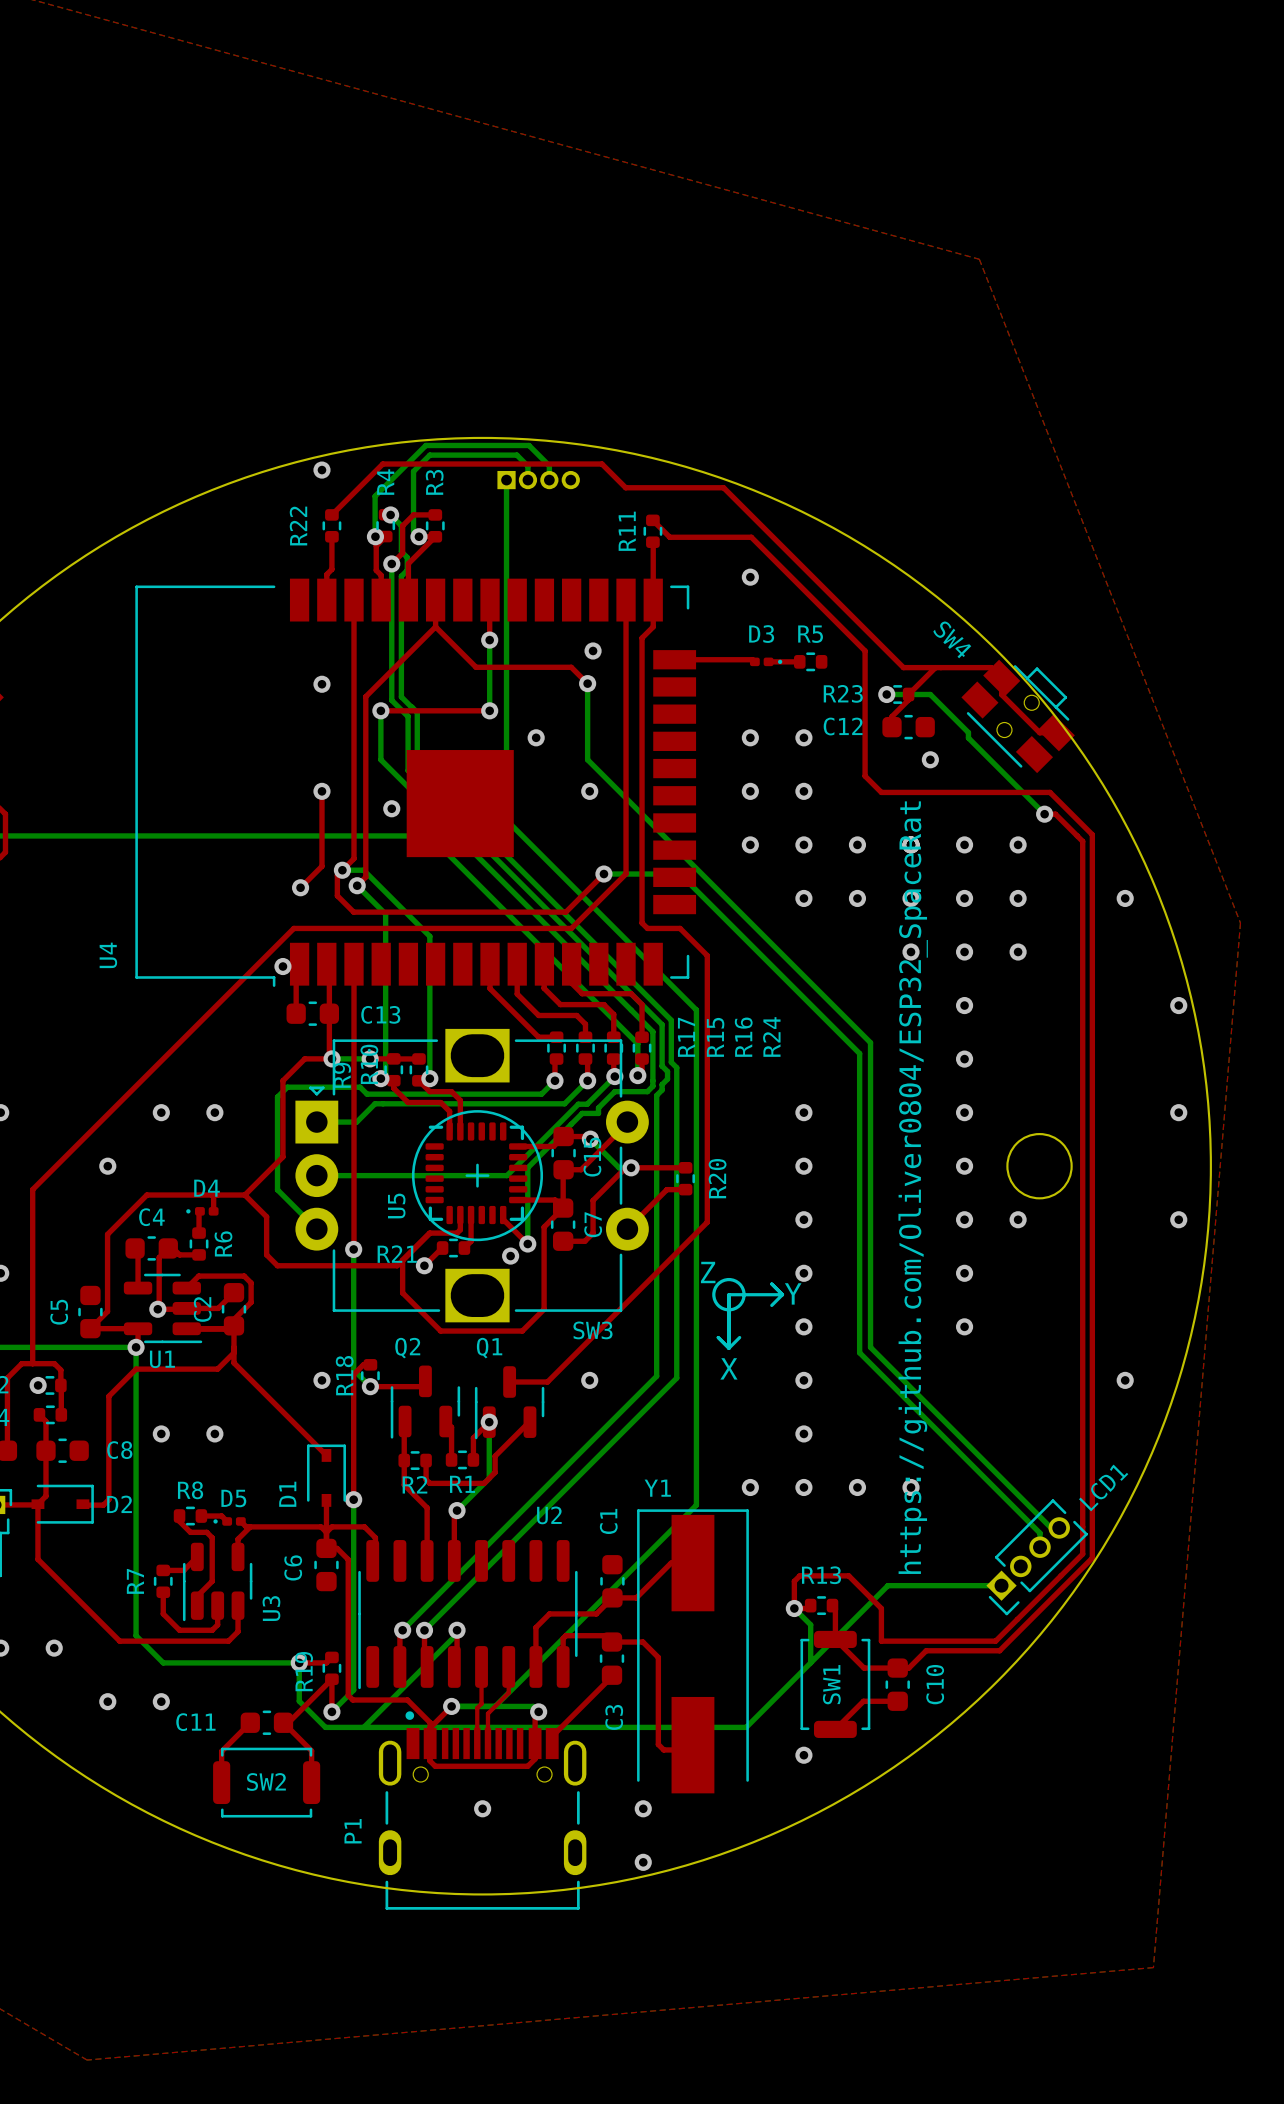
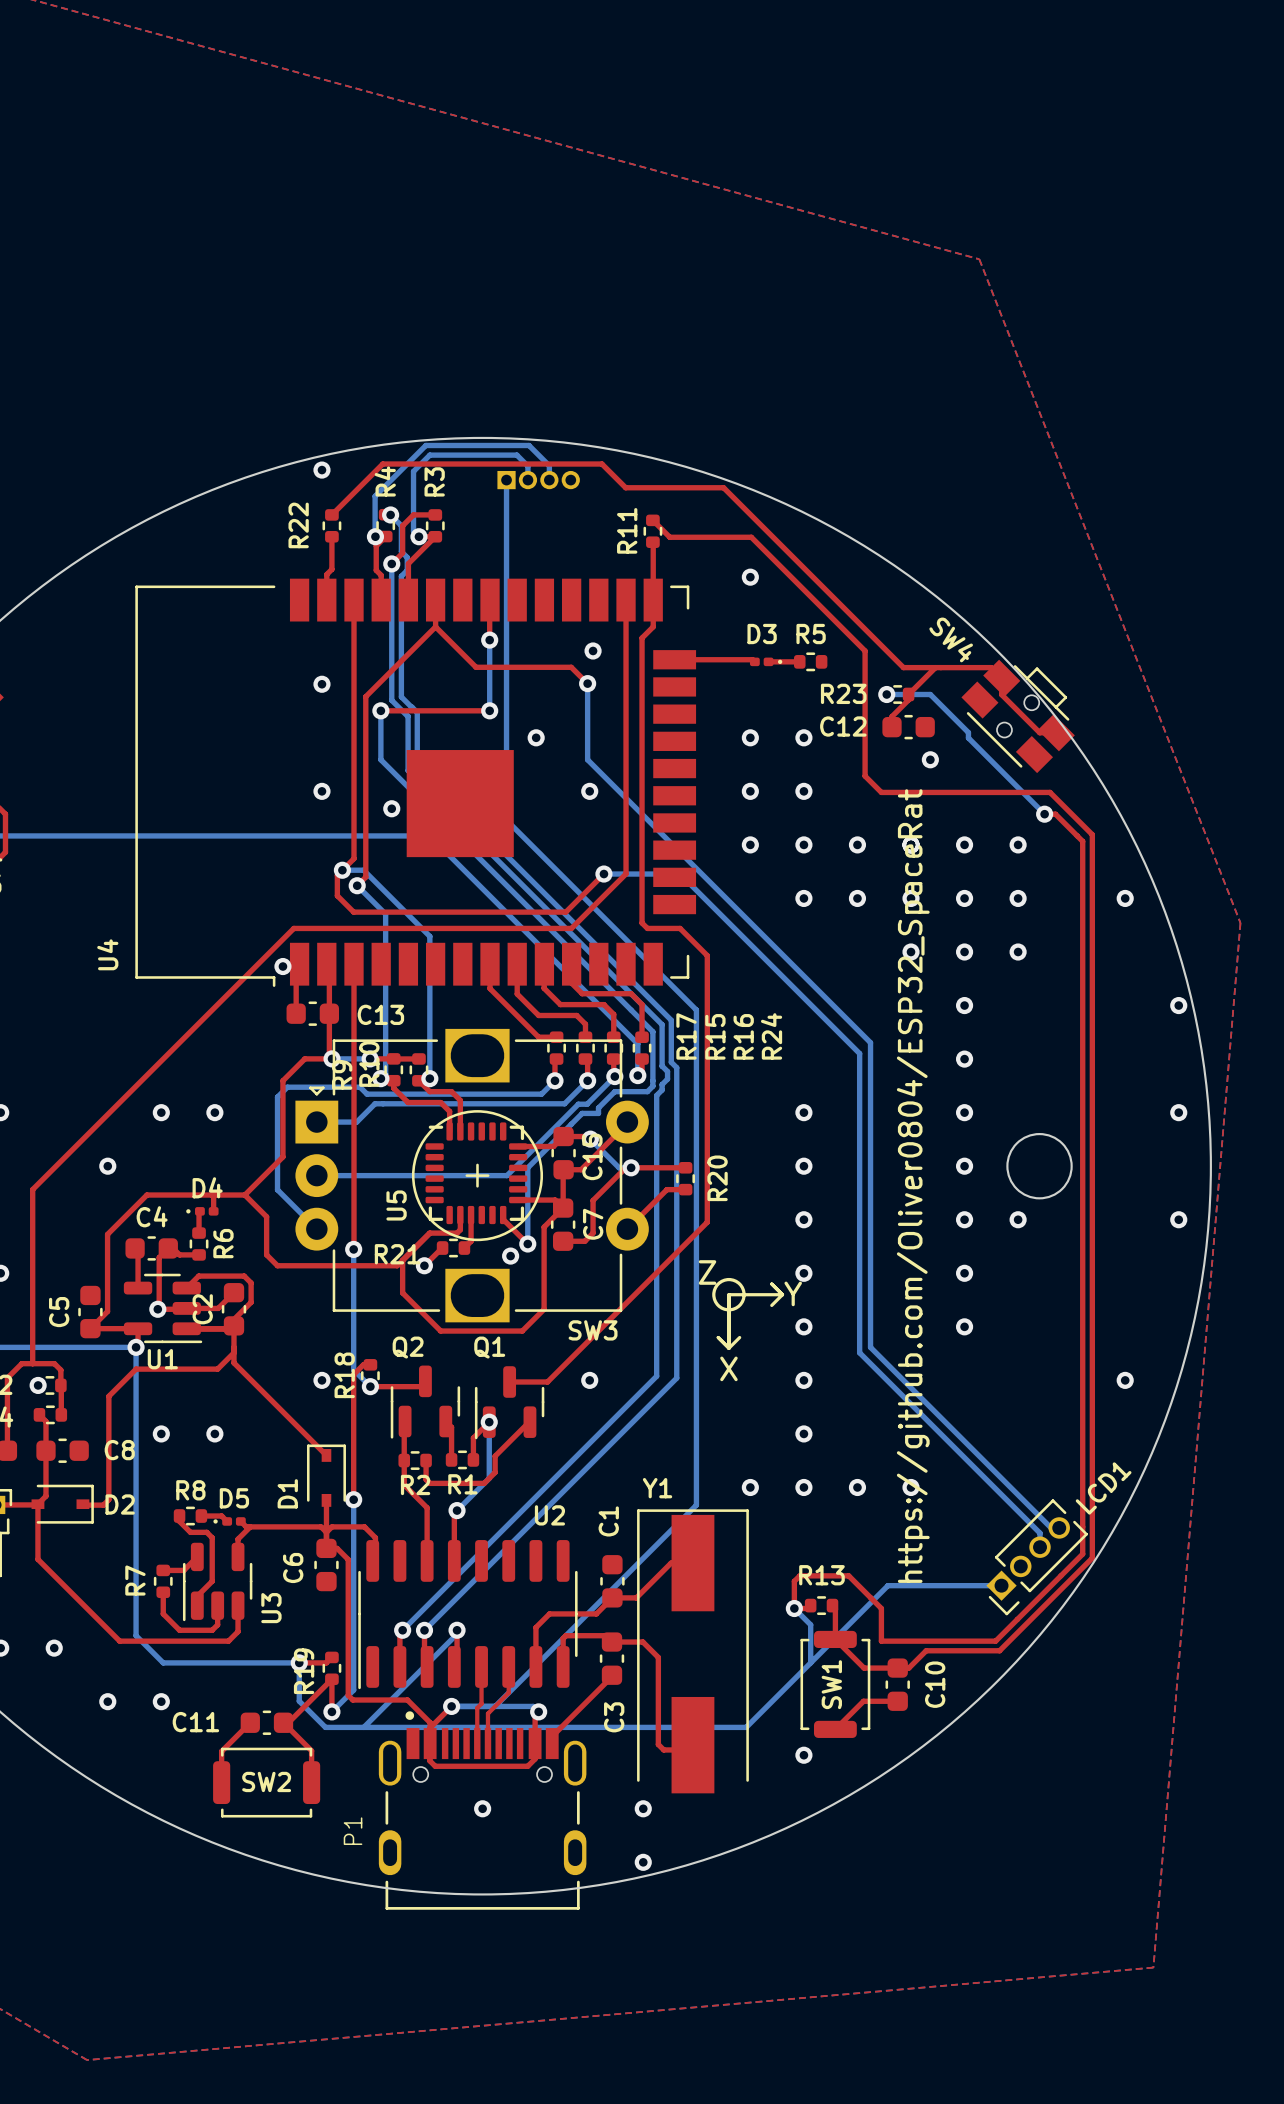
top track: (321, 791) (321, 866) (300, 887) -> none
via: (300, 887) -> none

